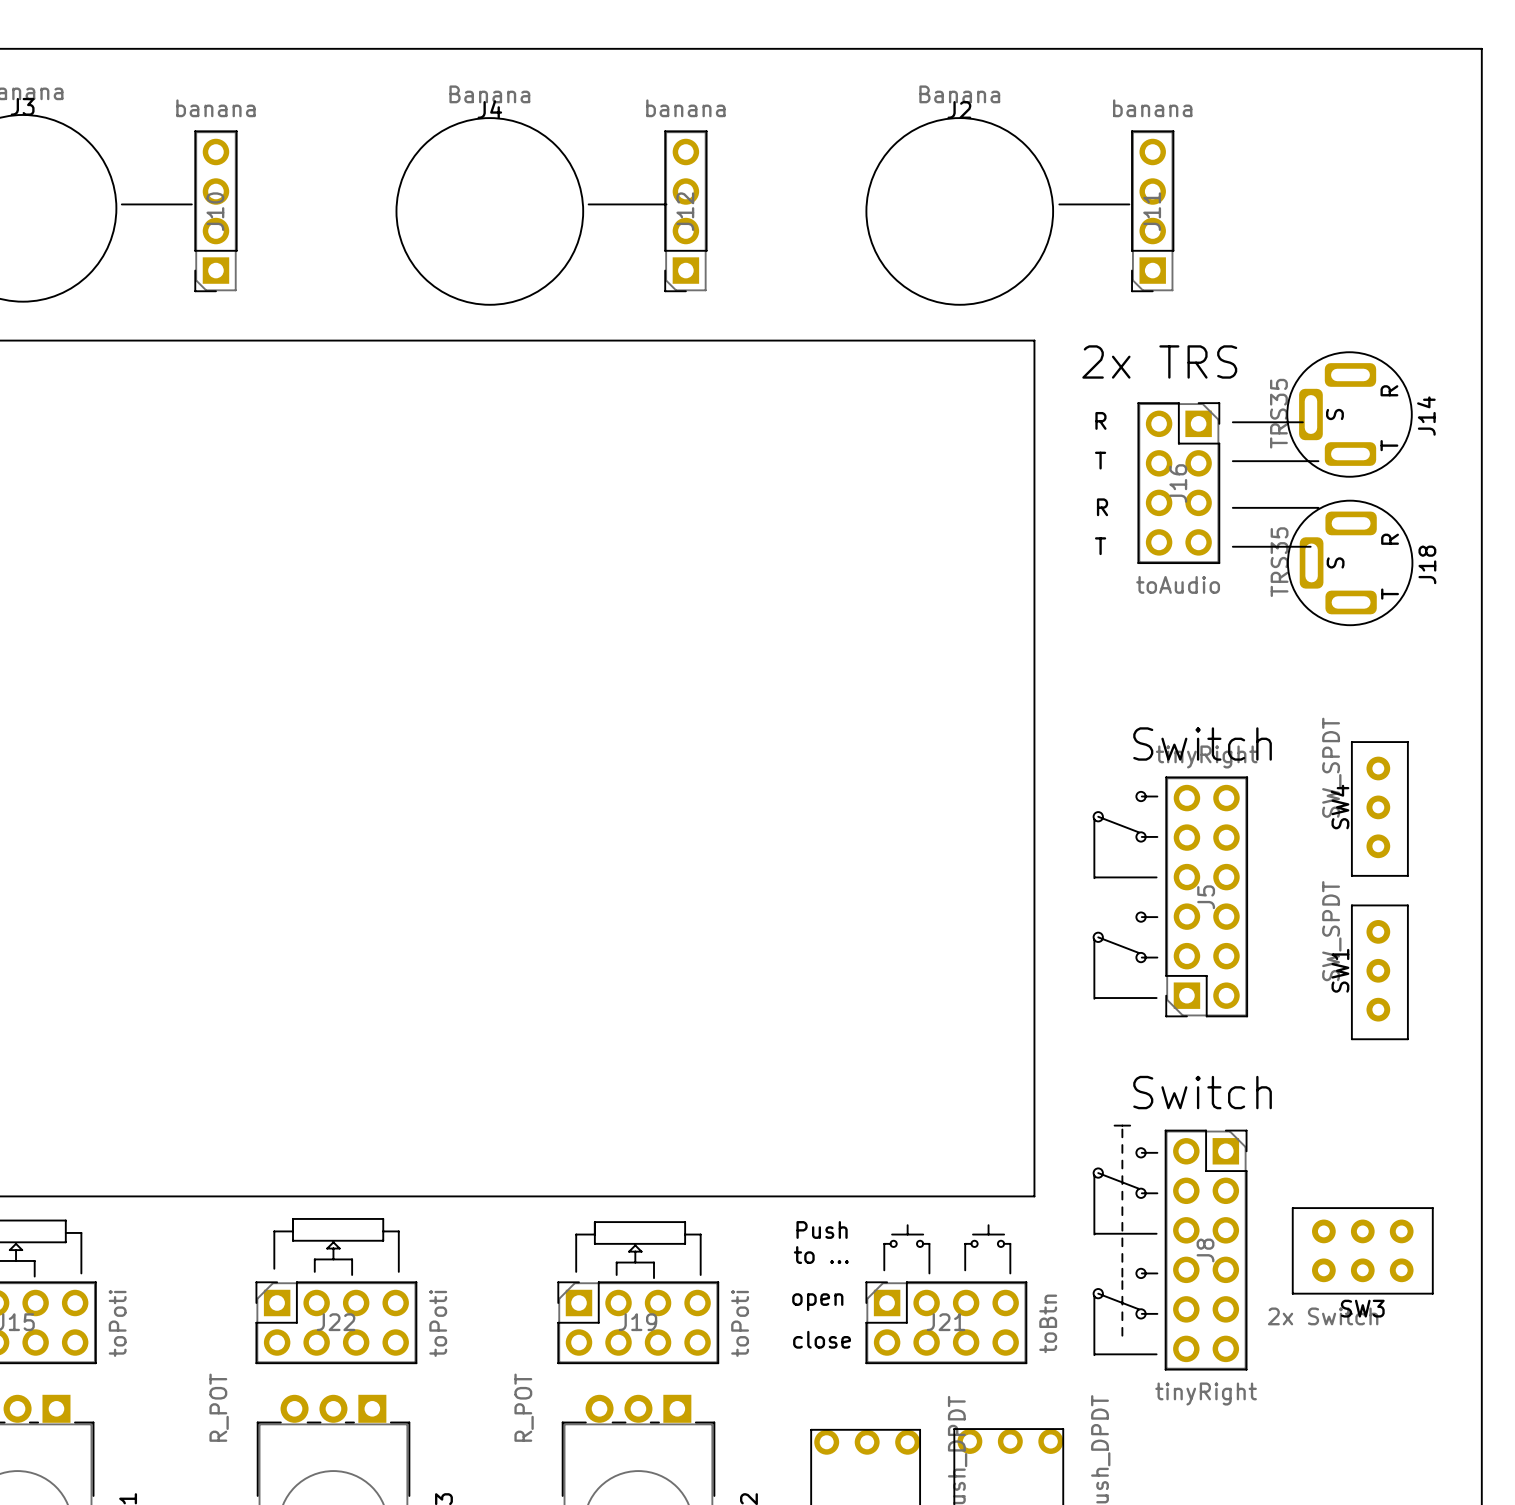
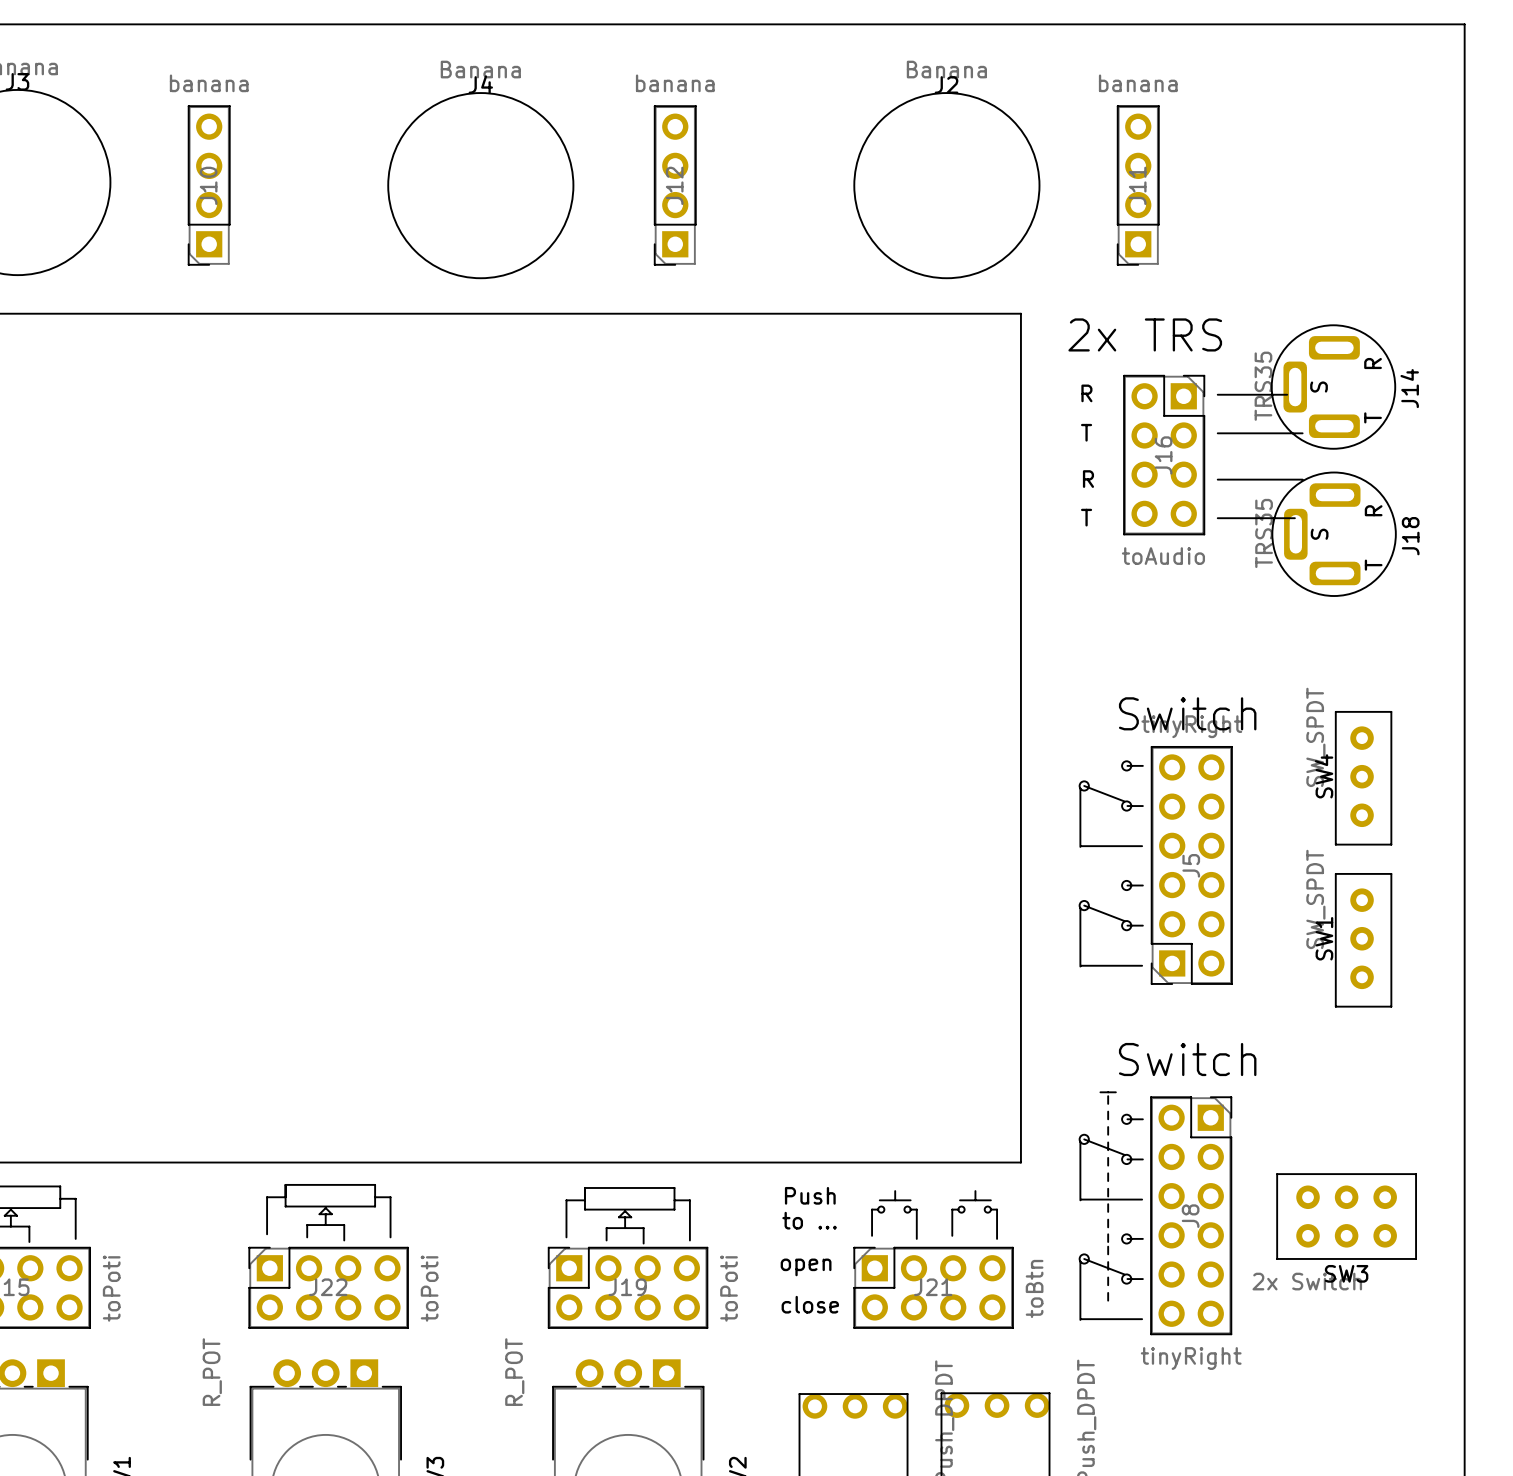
line: (121, 204) (191, 204) -> none
line: (588, 204) (666, 204) -> none
line: (1059, 204) (1129, 204) -> none

